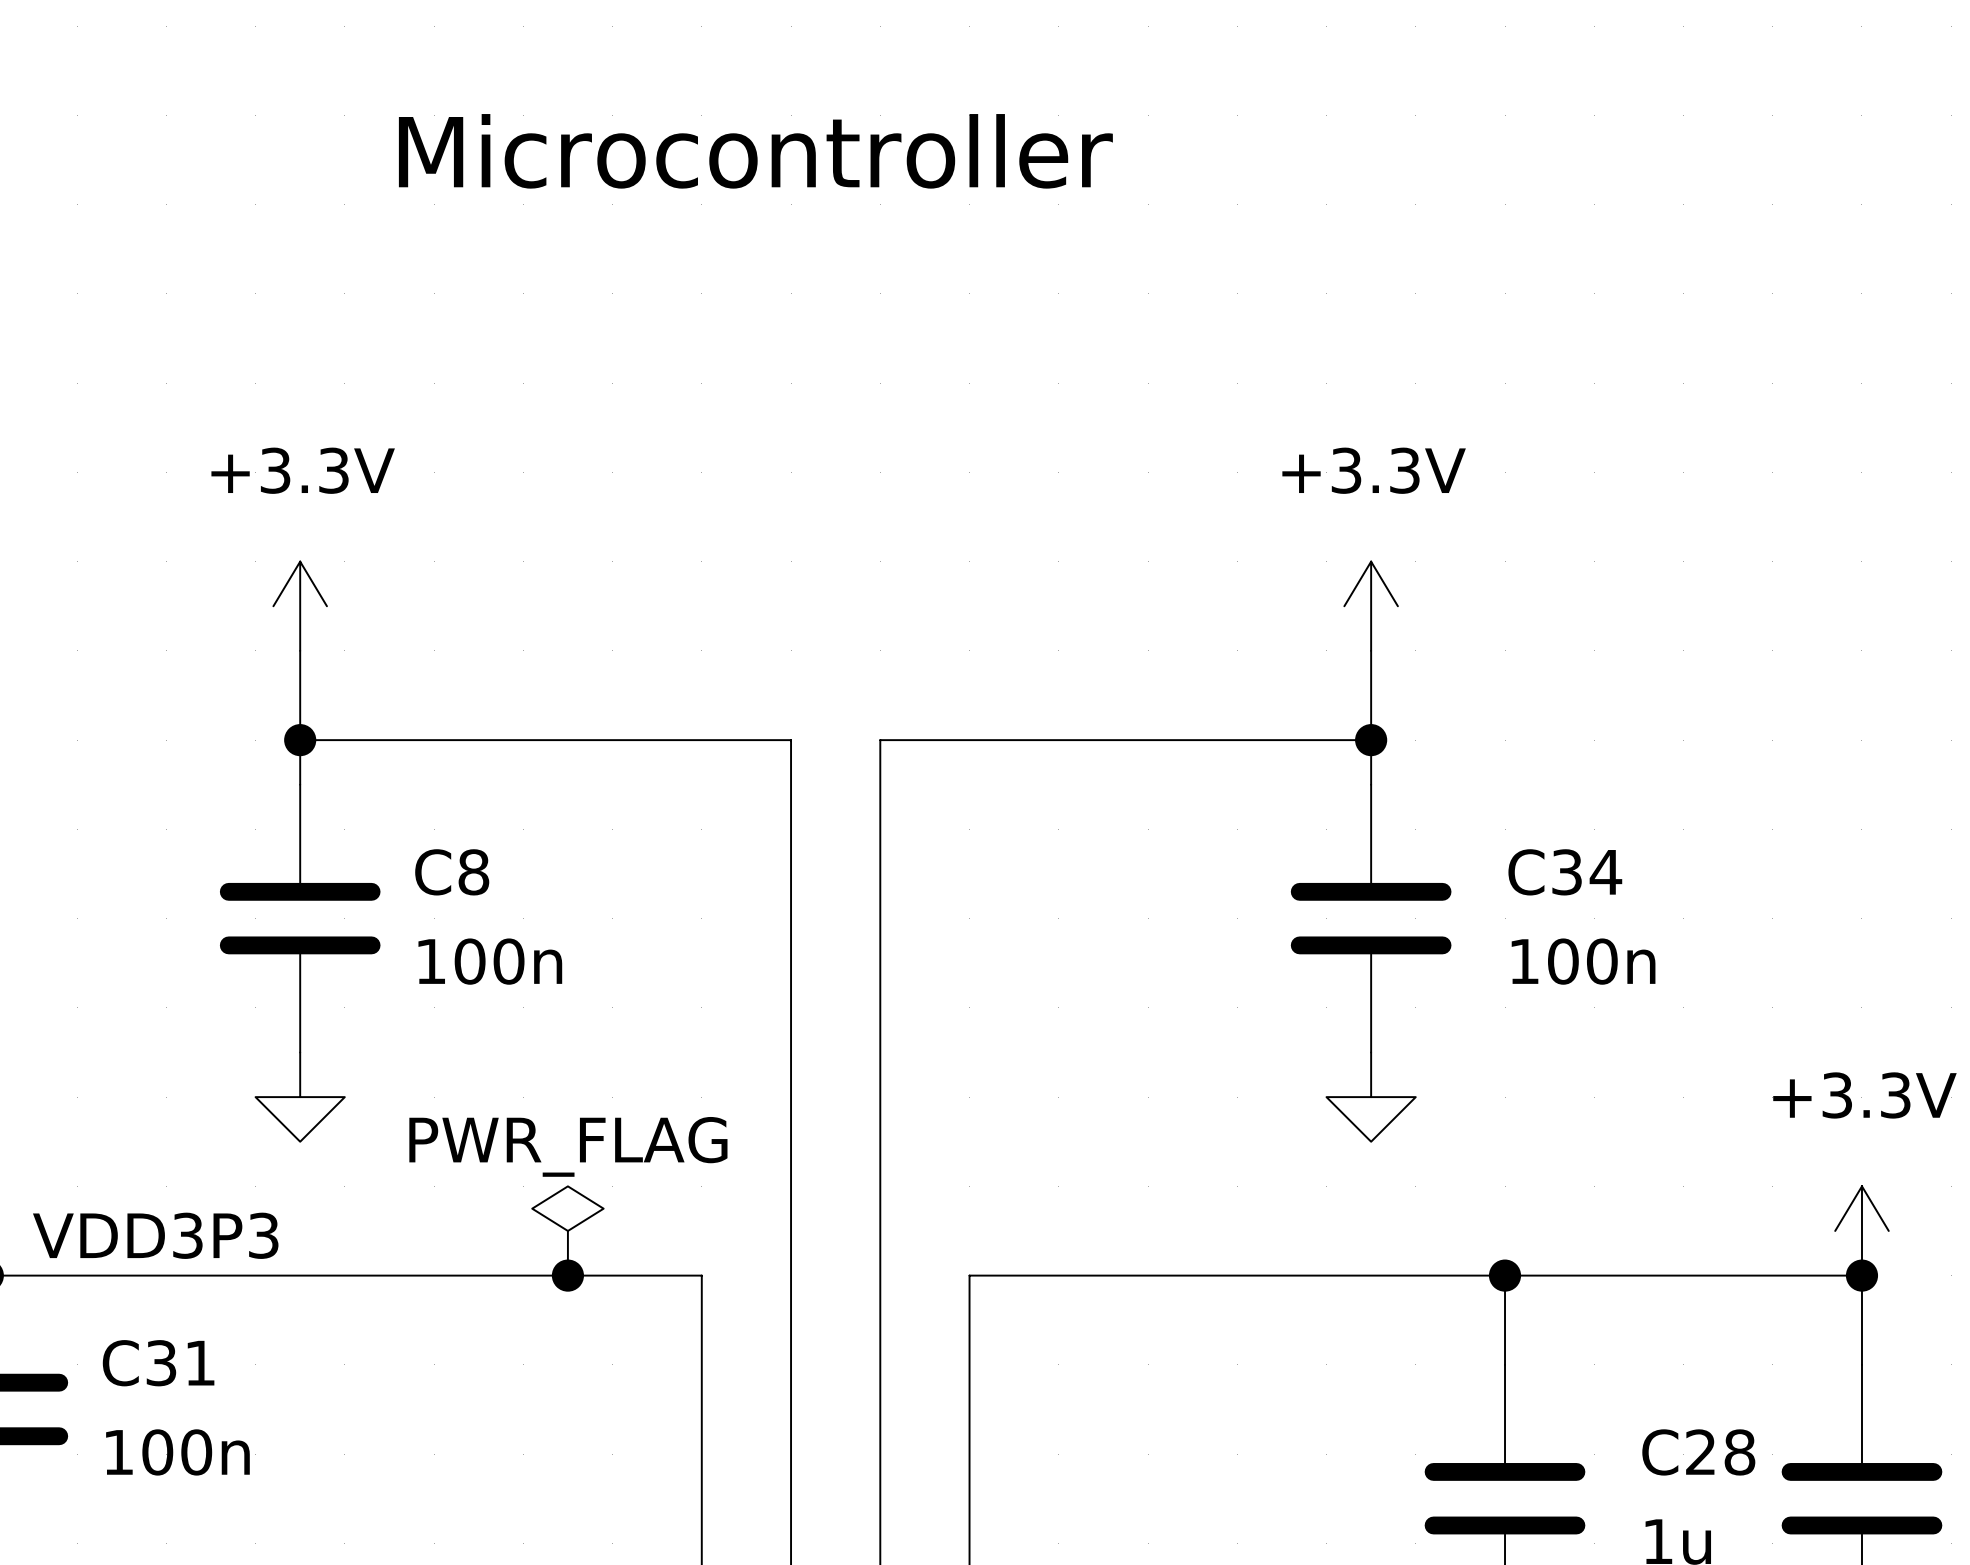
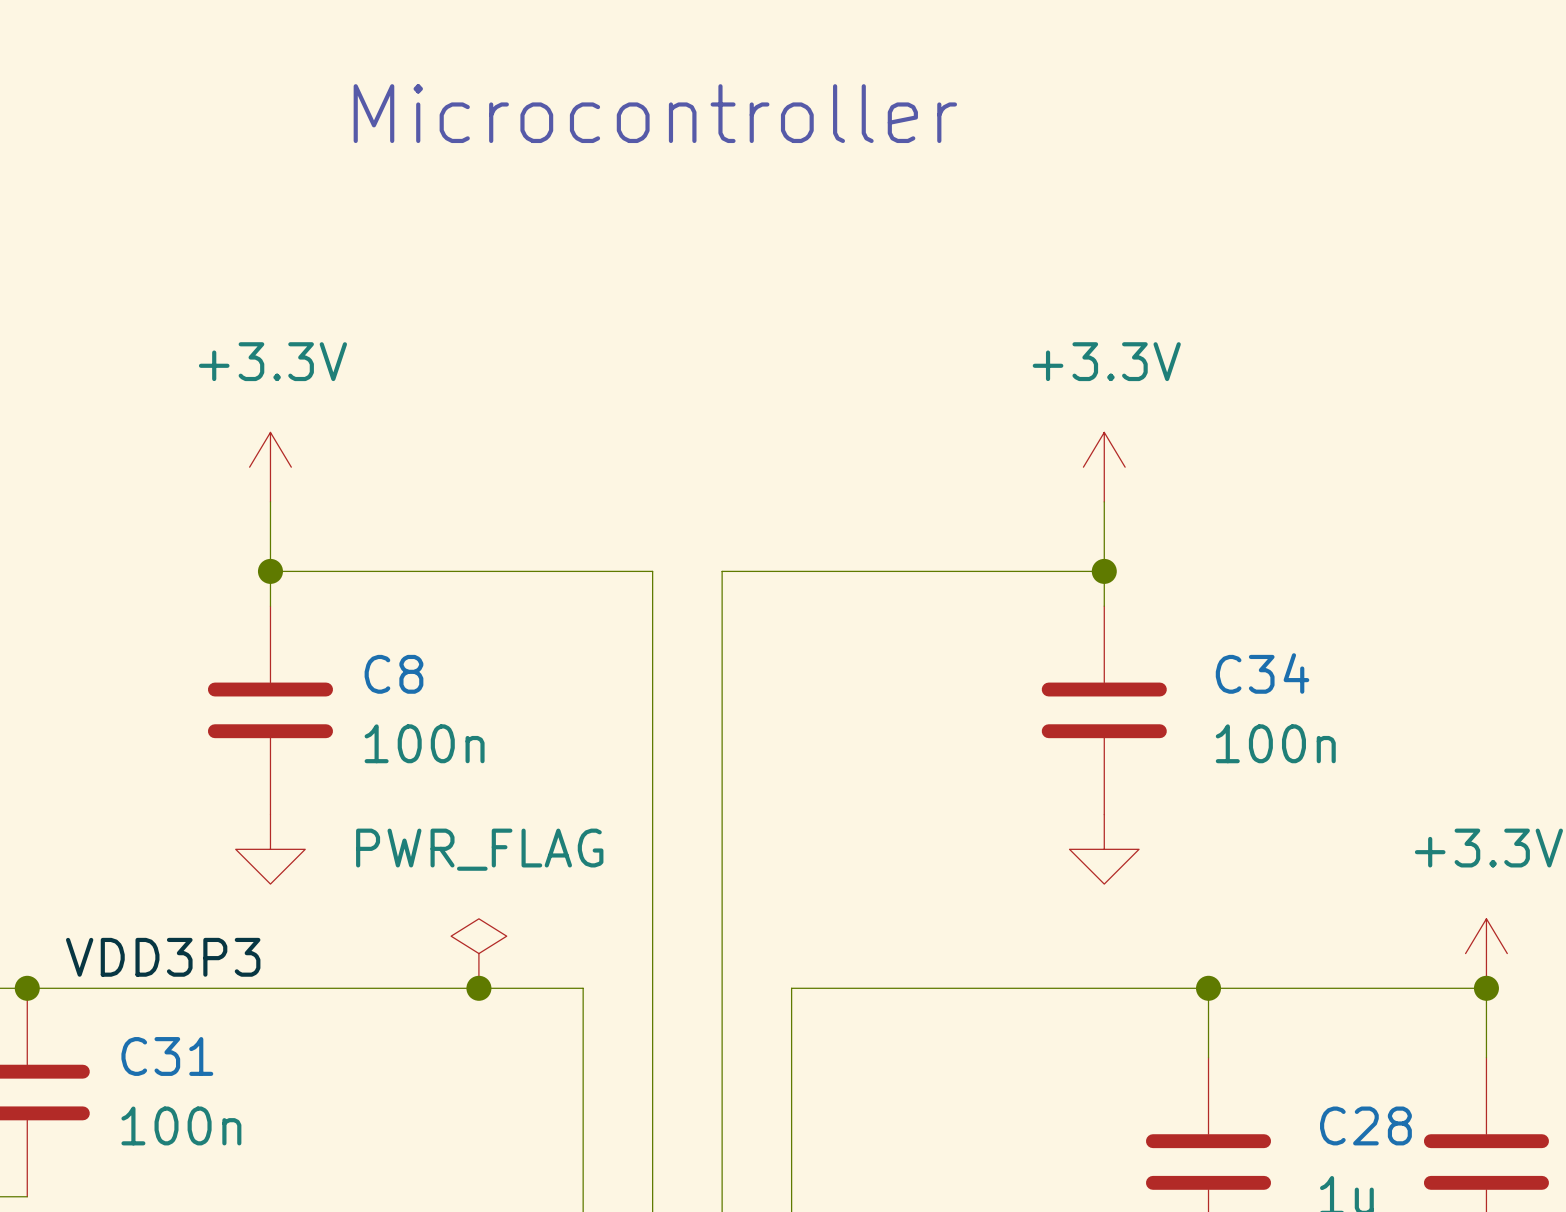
power symbol text position: PWR_FLAG (568, 1146) -> PWR_FLAG (479, 849)

